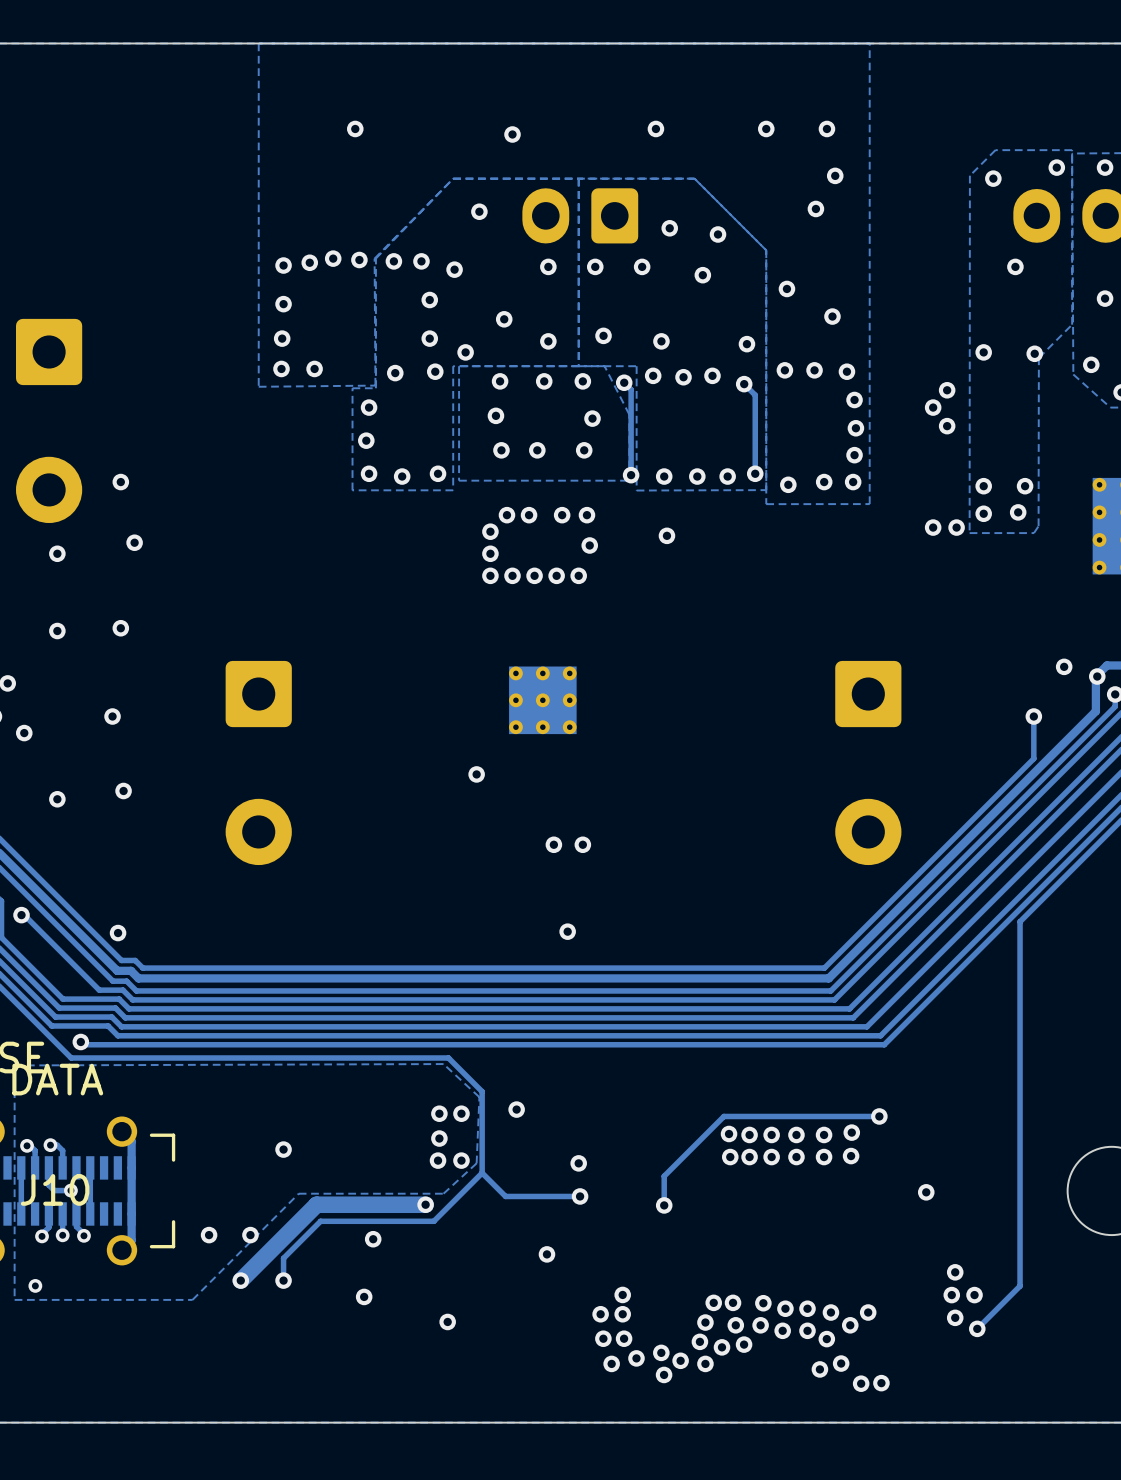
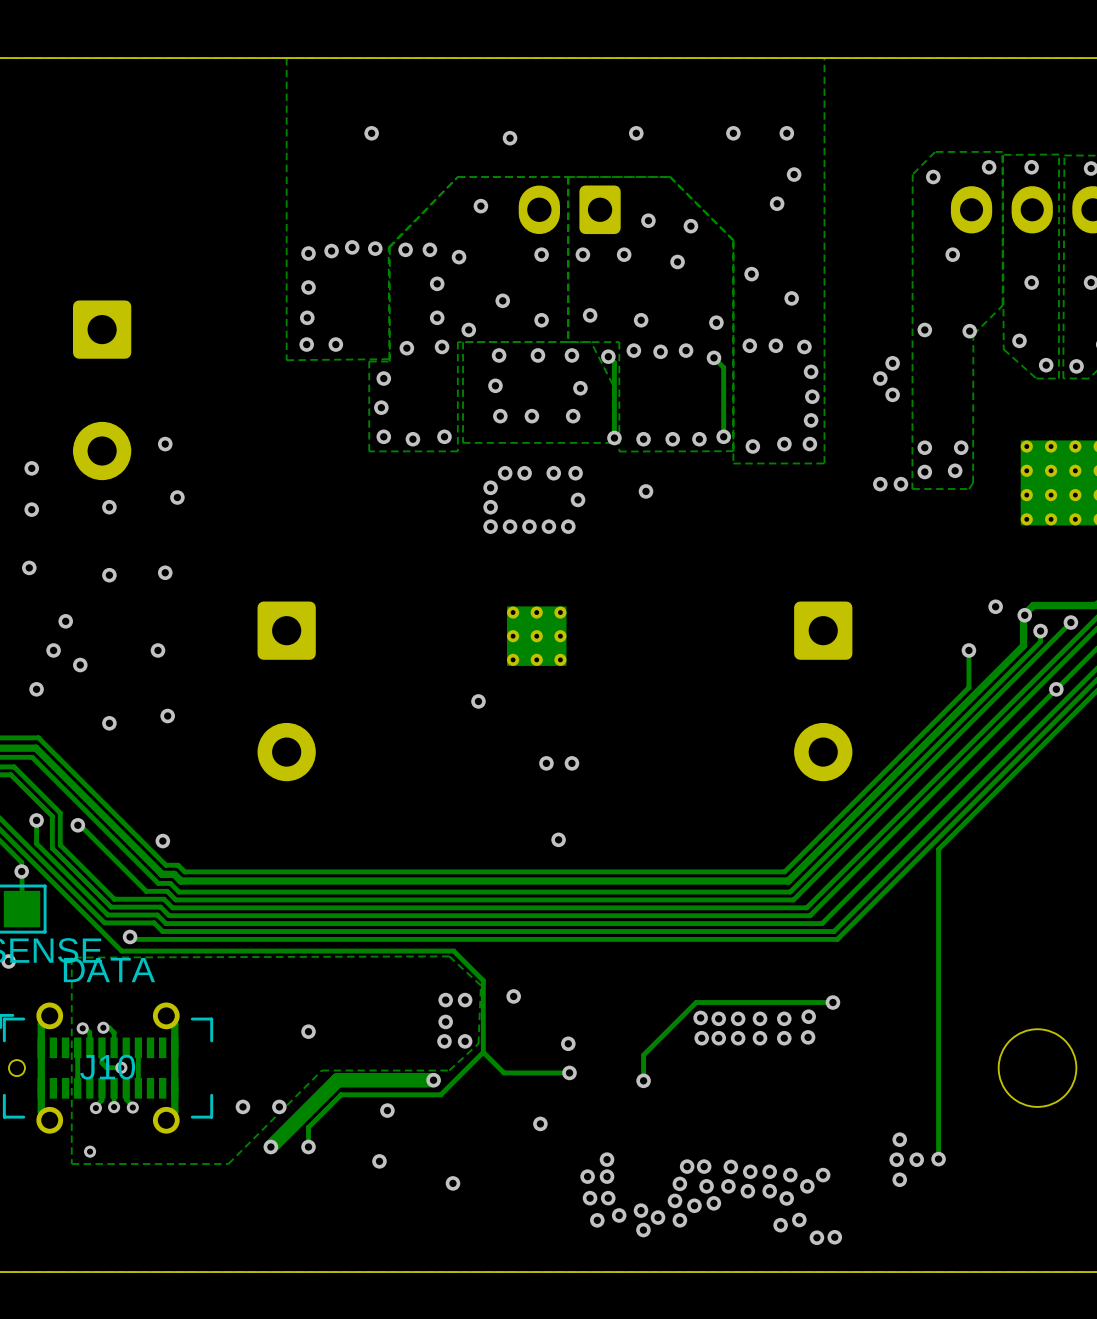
track: (1020, 921) (1020, 1286) (977, 1328) -> (956, 831) (938, 849) (938, 1159)
via: (926, 1192) -> none
via position: (977, 1328) -> (938, 1159)

